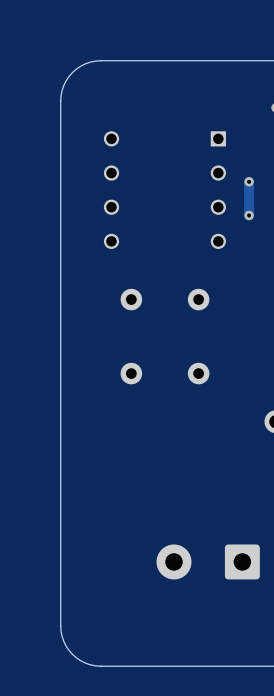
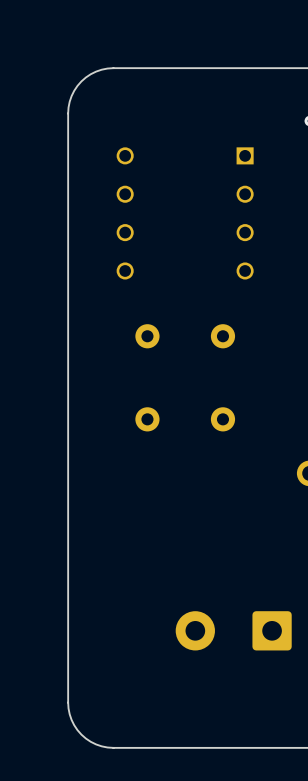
track: (249, 181) (249, 215) -> none
via: (249, 181) -> none
via: (249, 215) -> none

